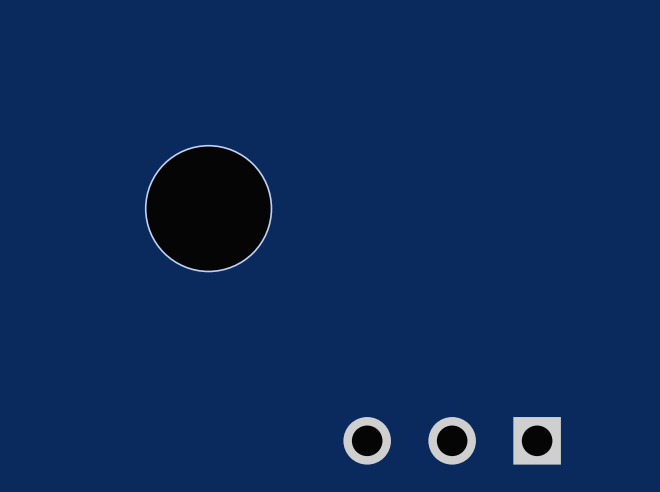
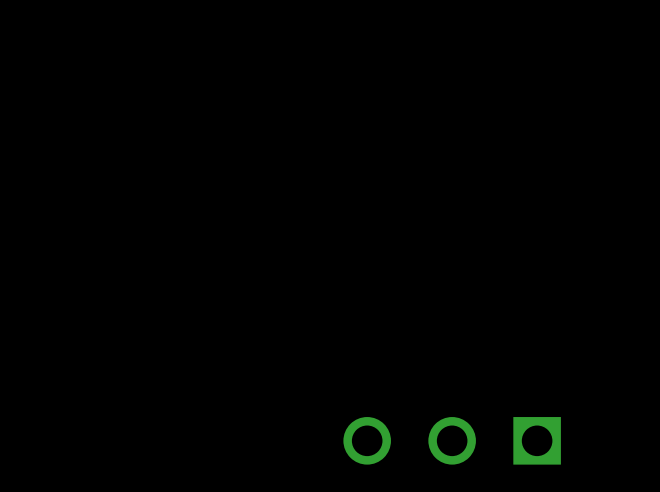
part: (208, 208) -> none

